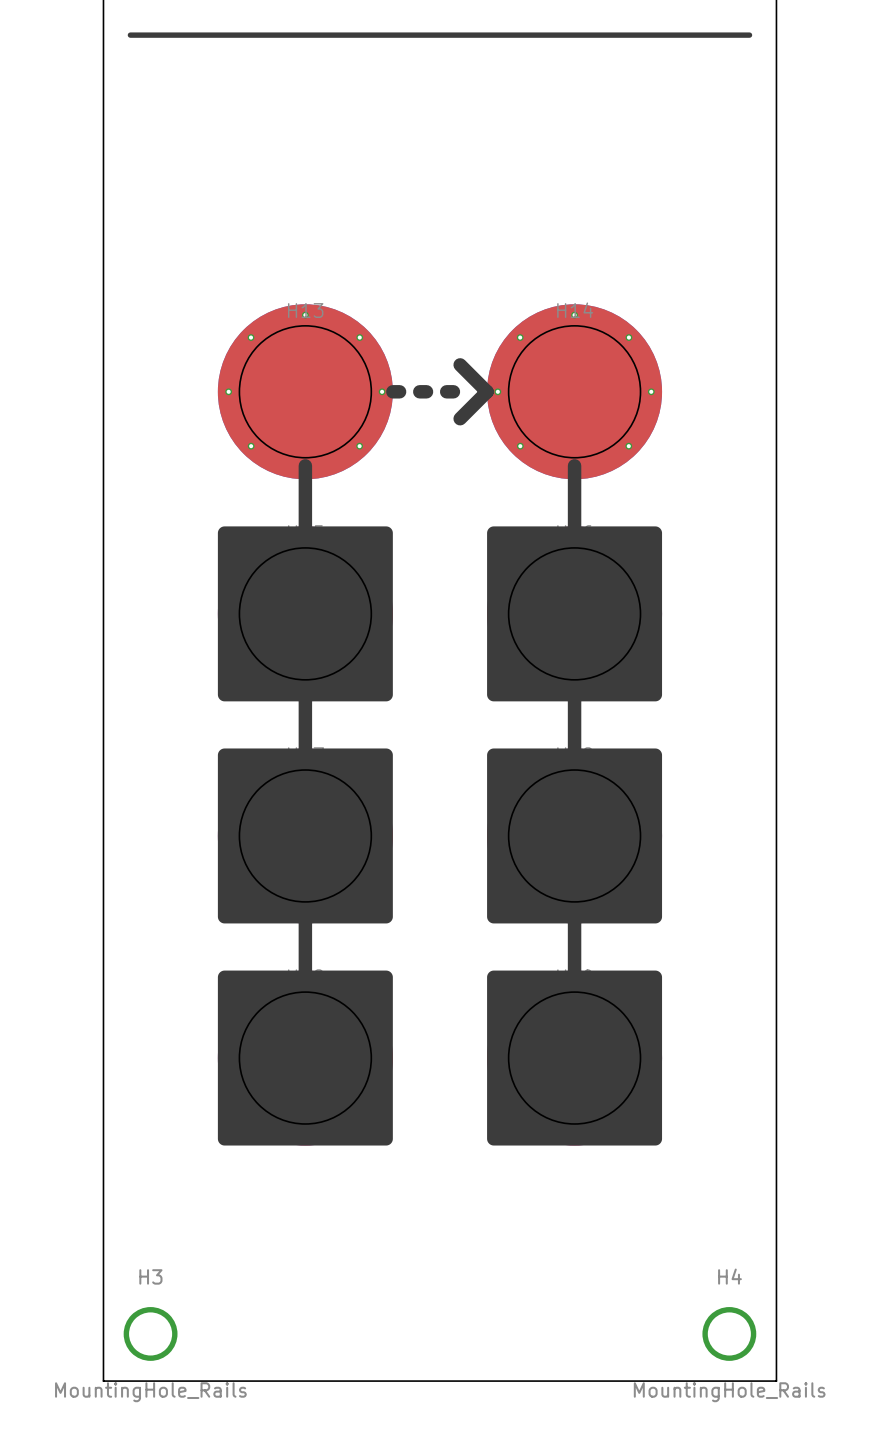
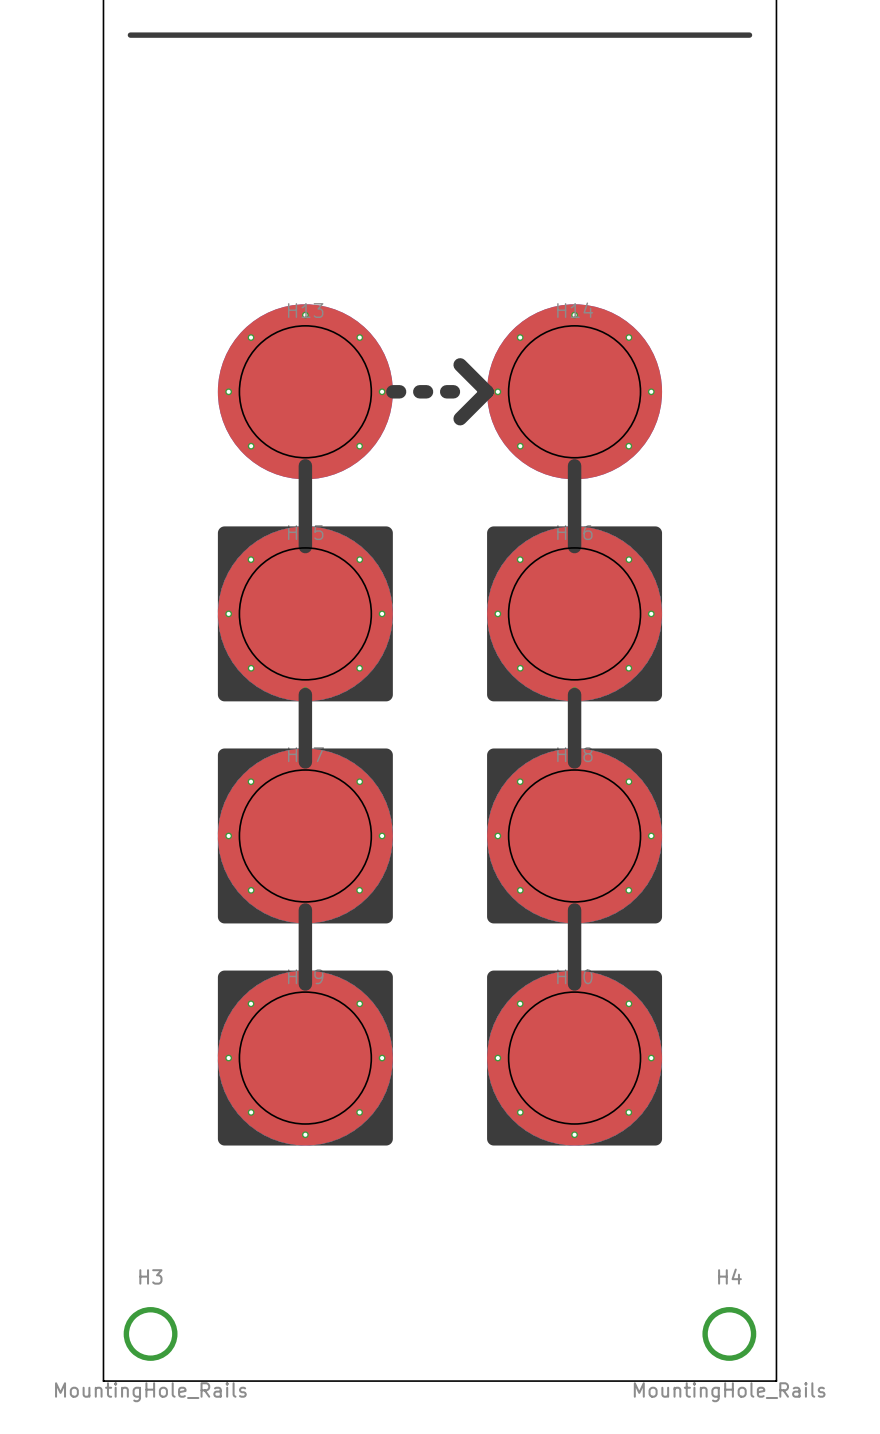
part footprint: [217, 526, 393, 702] -> [217, 526, 393, 702]
part footprint: [487, 526, 663, 702] -> [487, 526, 663, 702]
part footprint: [217, 748, 393, 924] -> [217, 748, 393, 924]
part footprint: [487, 748, 663, 924] -> [487, 748, 663, 924]
part footprint: [217, 970, 393, 1146] -> [217, 970, 393, 1146]
part footprint: [487, 970, 663, 1146] -> [487, 970, 663, 1146]

